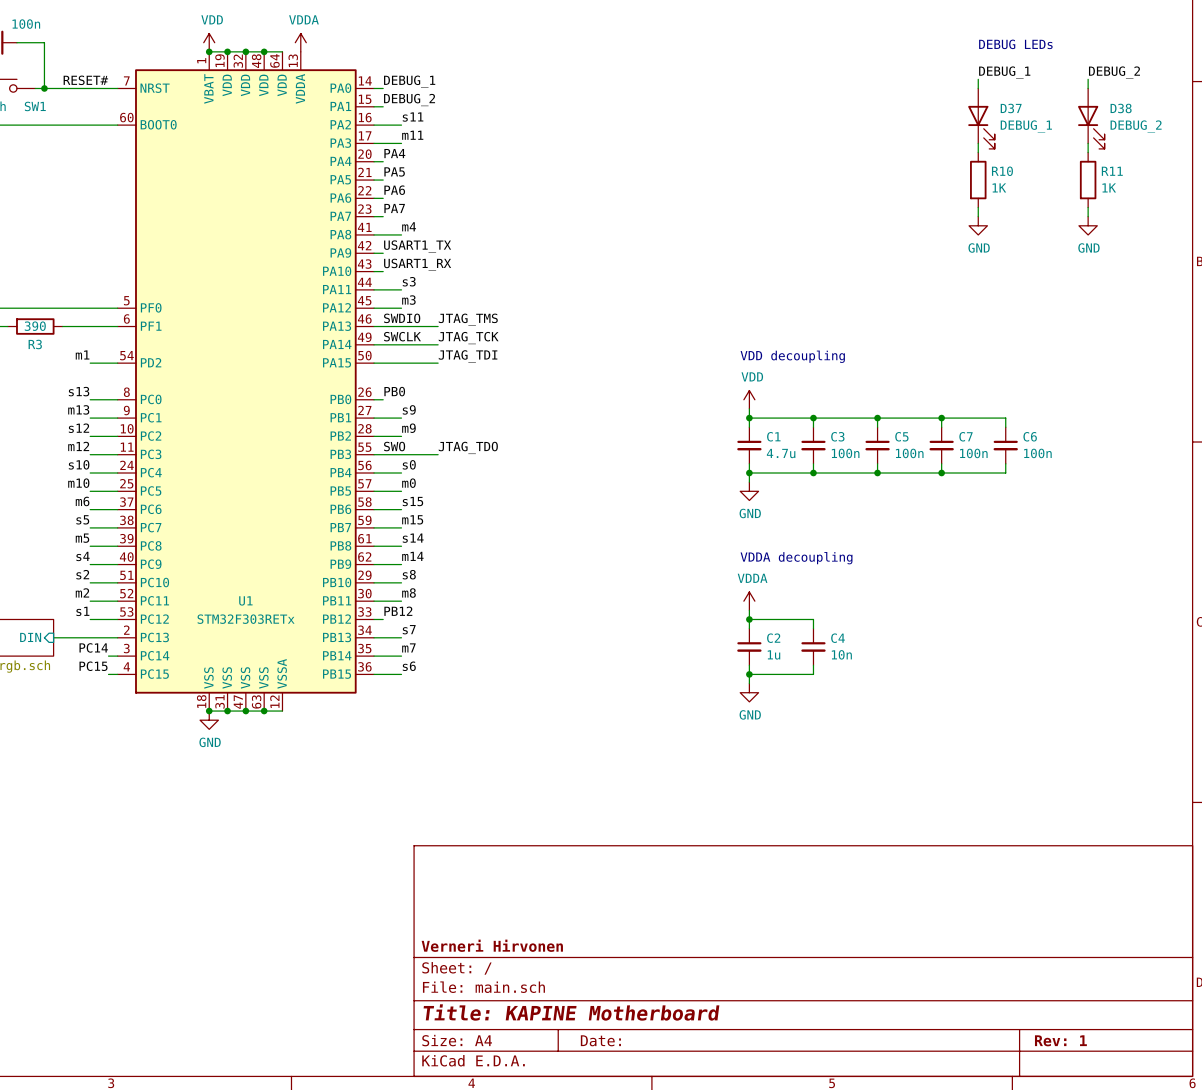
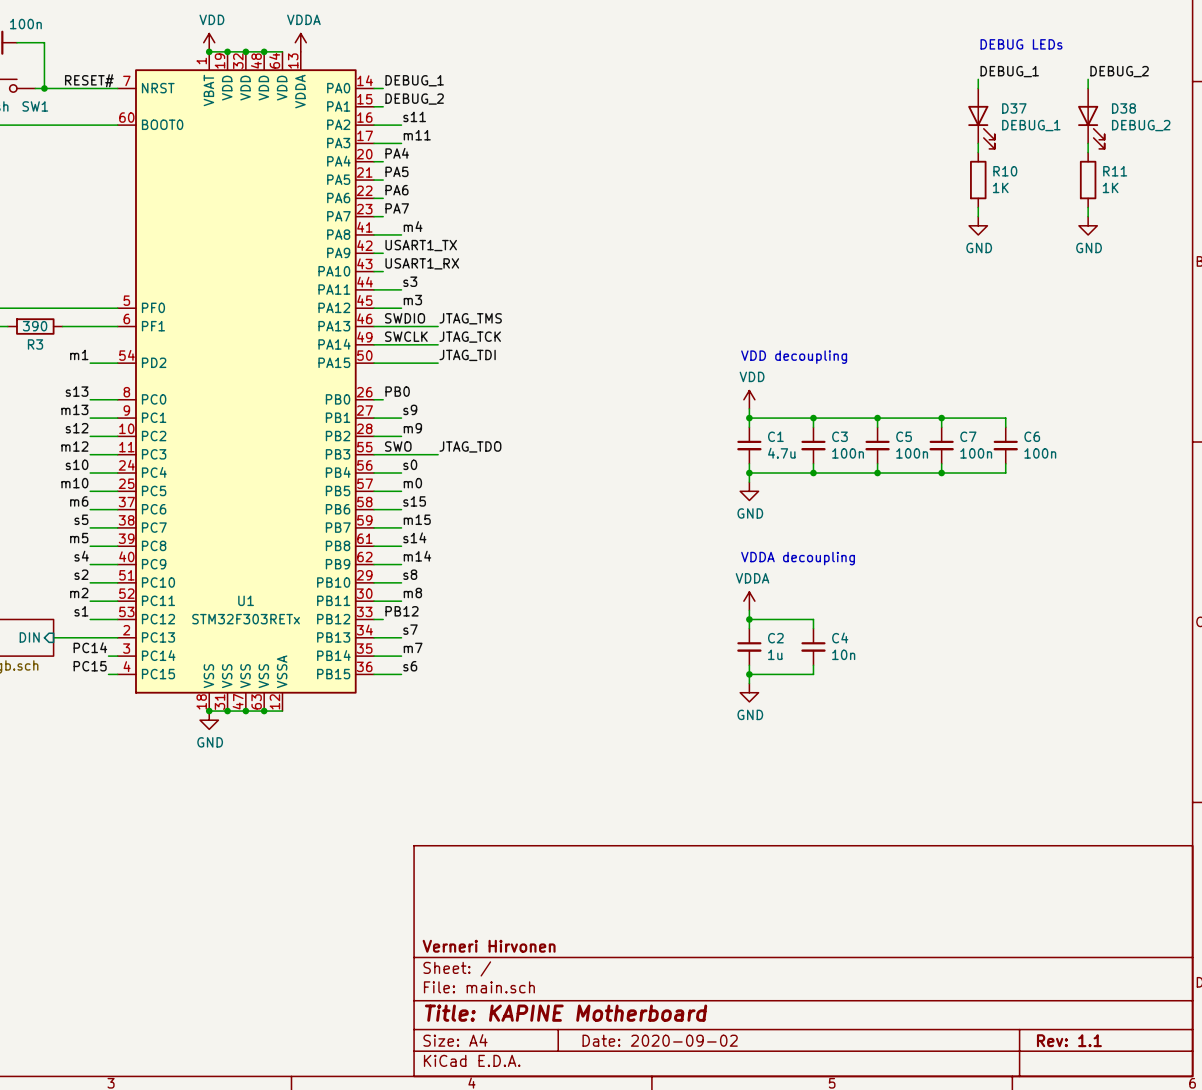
title block: Date: (600, 1040) -> Date: 2020-09-02 (660, 1040)
title block: Rev: 1 (1060, 1040) -> Rev: 1.1 (1069, 1040)

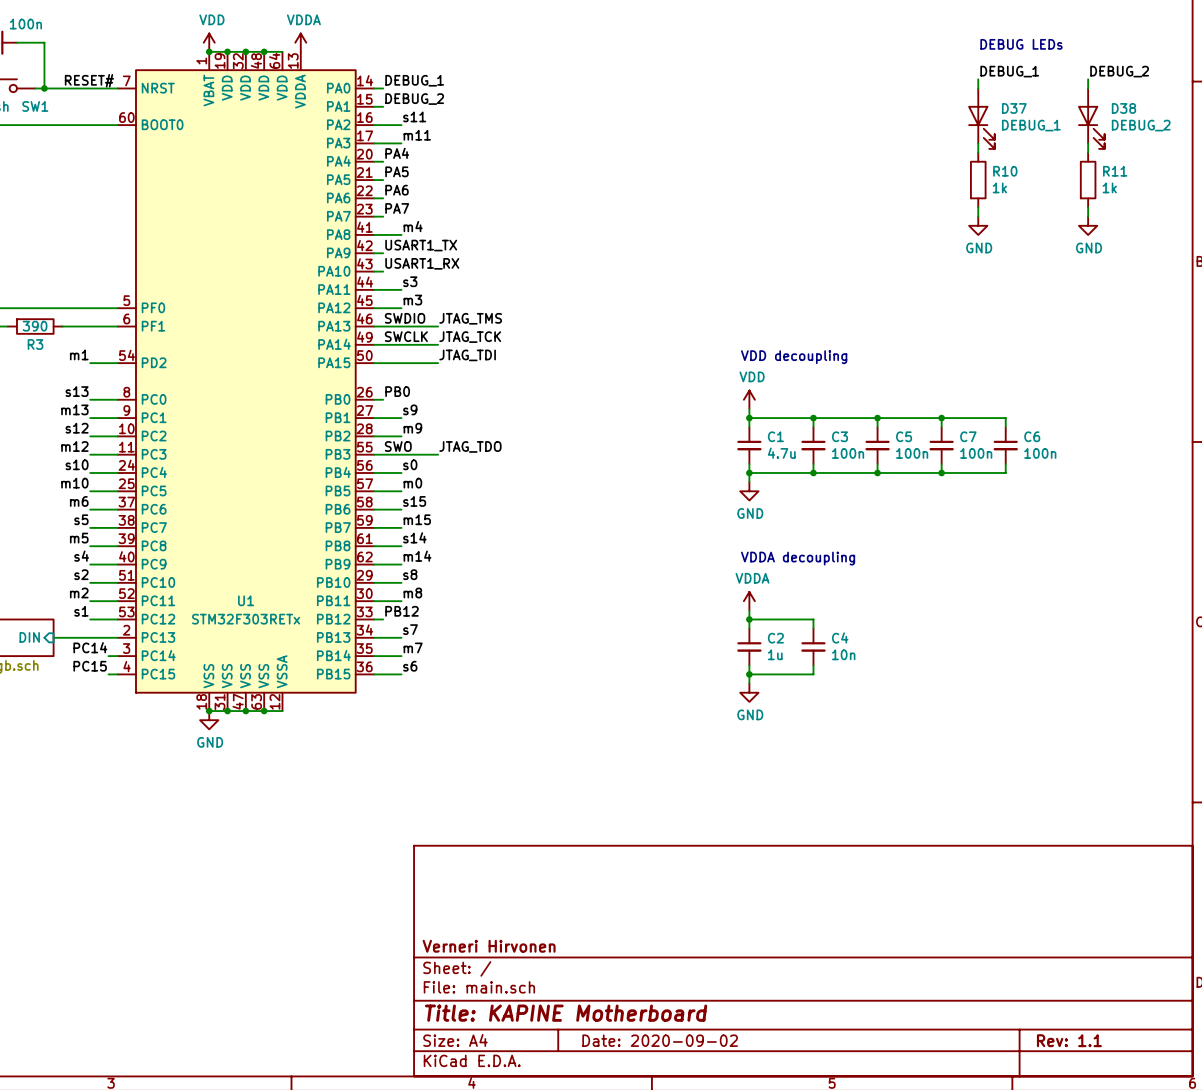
R10 value: 1K (1000, 187) -> 1k (999, 187)
R11 value: 1K (1110, 187) -> 1k (1109, 187)

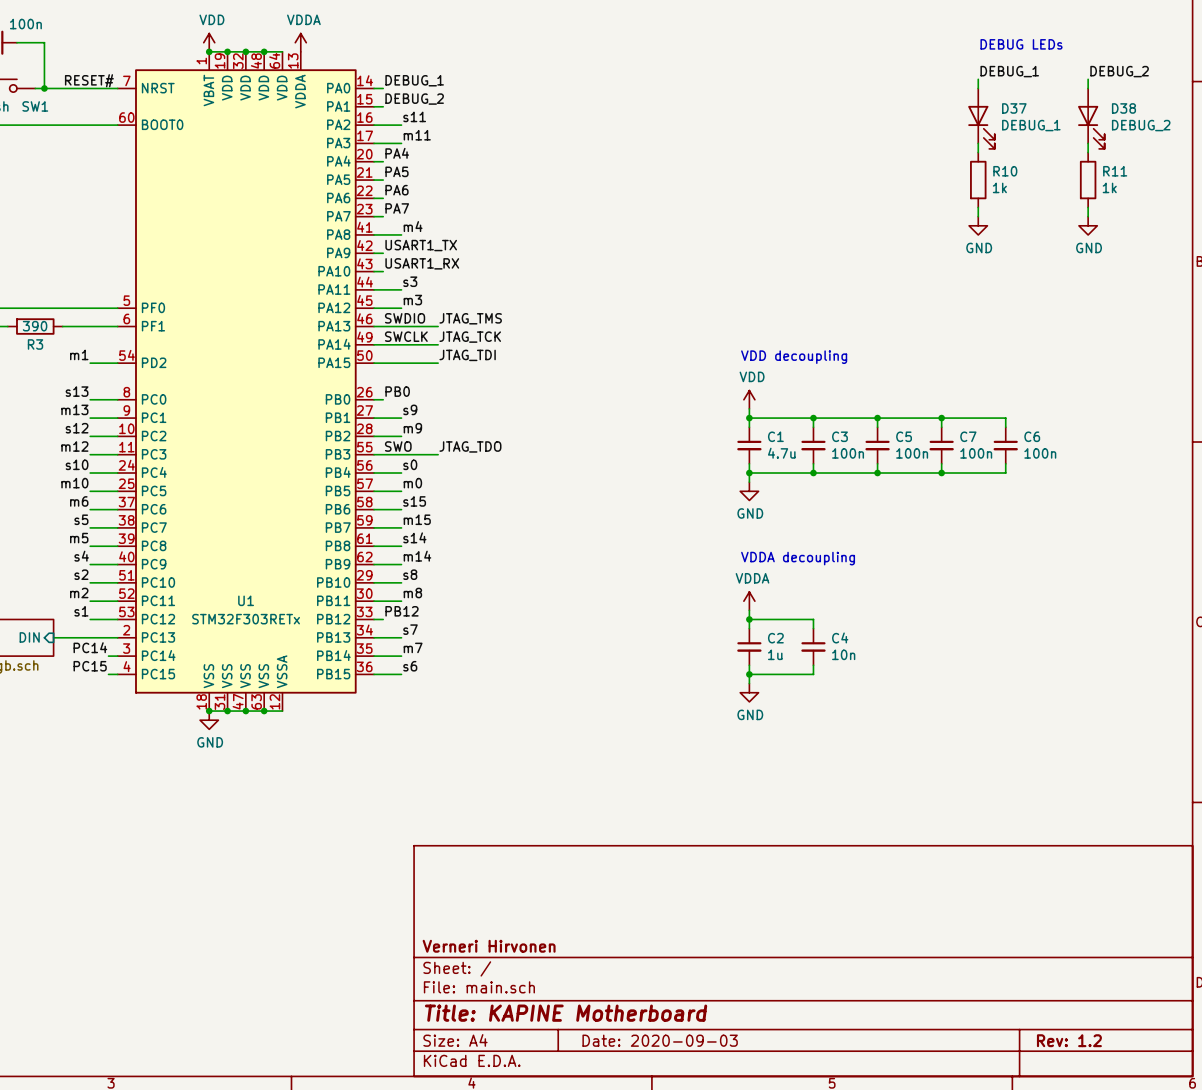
title block: Date: 2020-09-02 (660, 1040) -> Date: 2020-09-03 (660, 1040)
title block: Rev: 1.1 (1069, 1040) -> Rev: 1.2 (1069, 1040)

